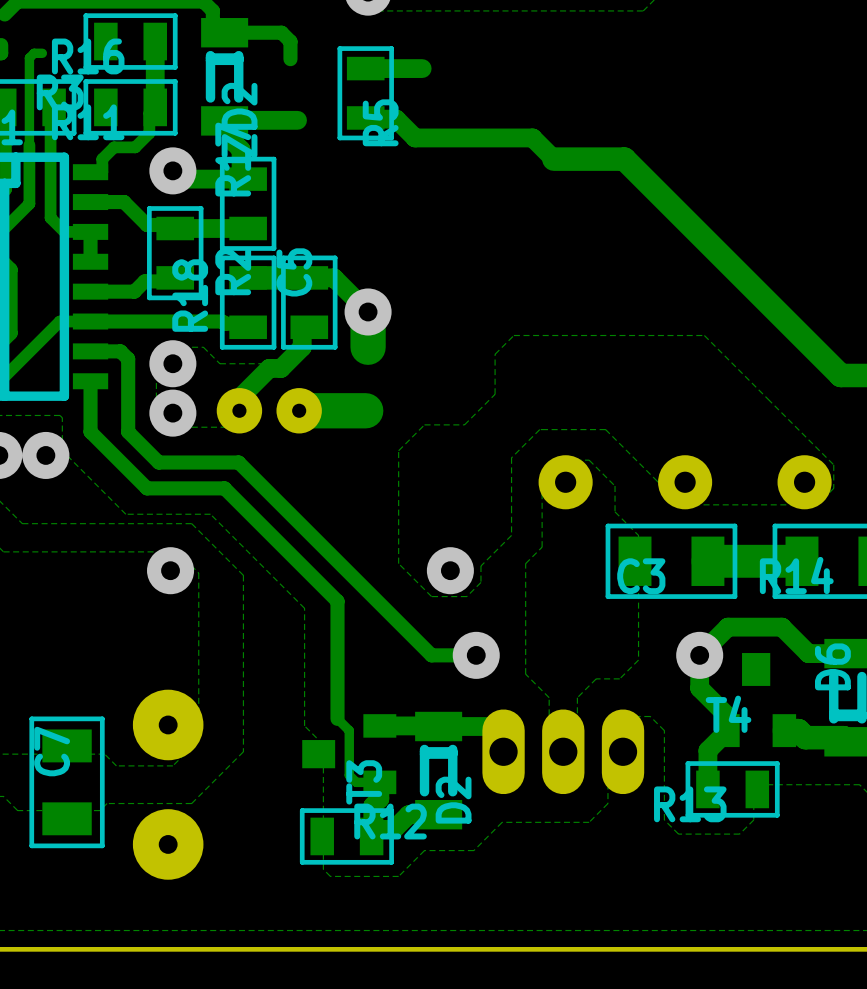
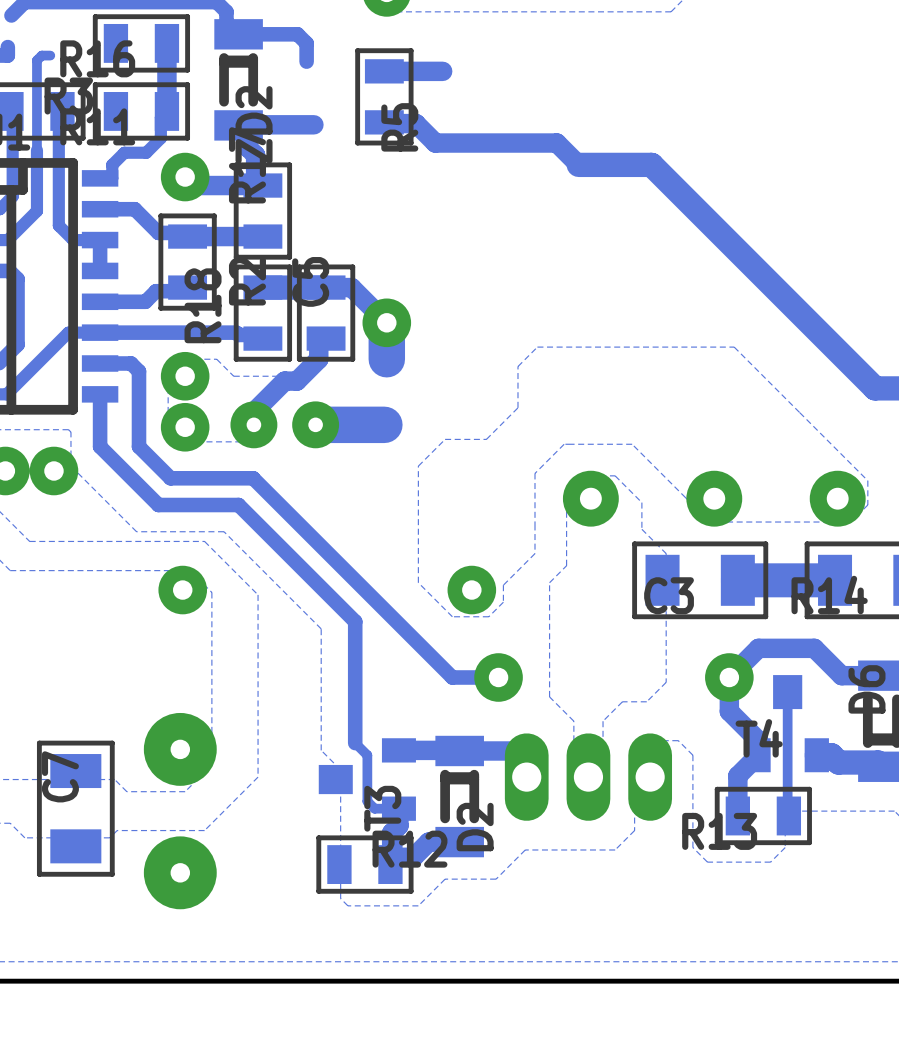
track: none -> (787, 692) (787, 814)

